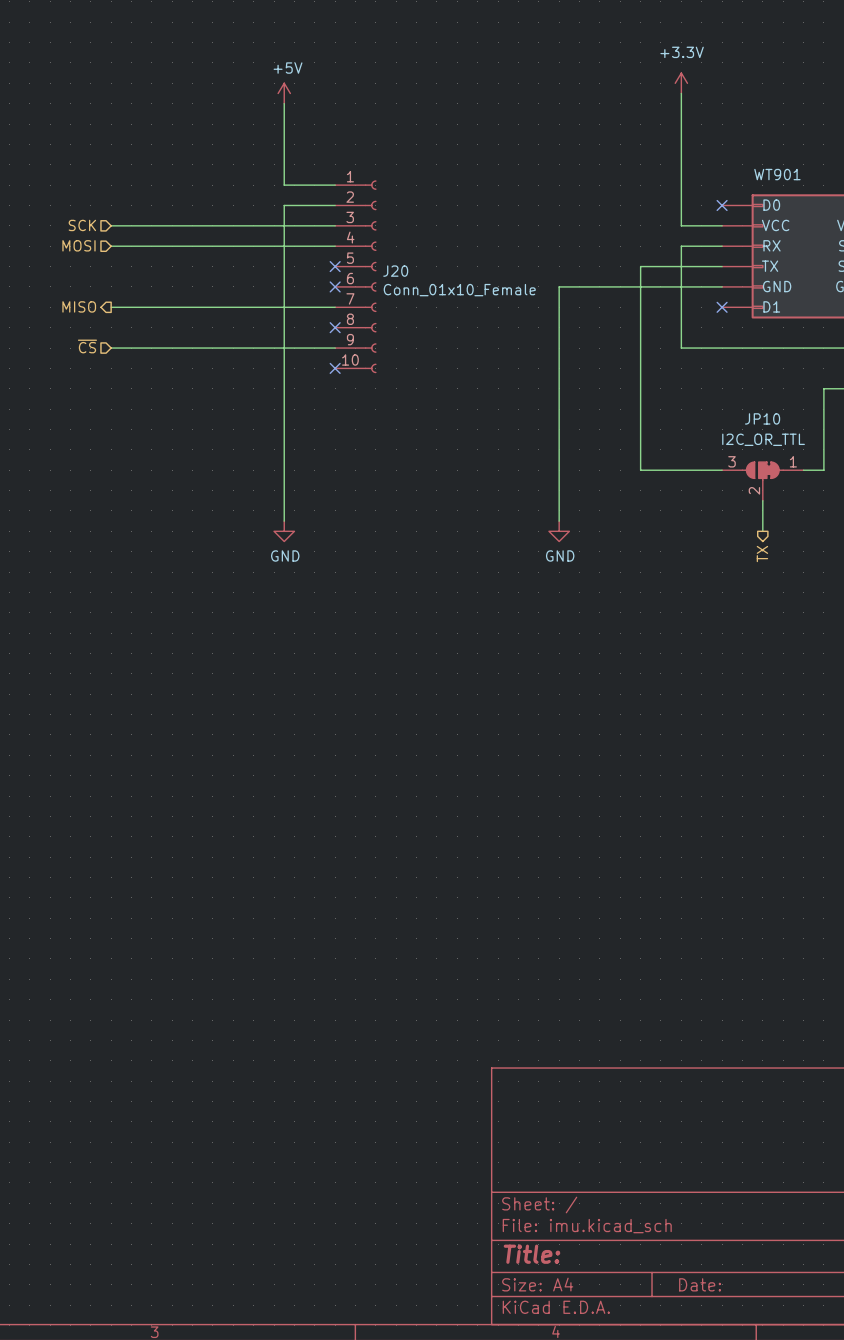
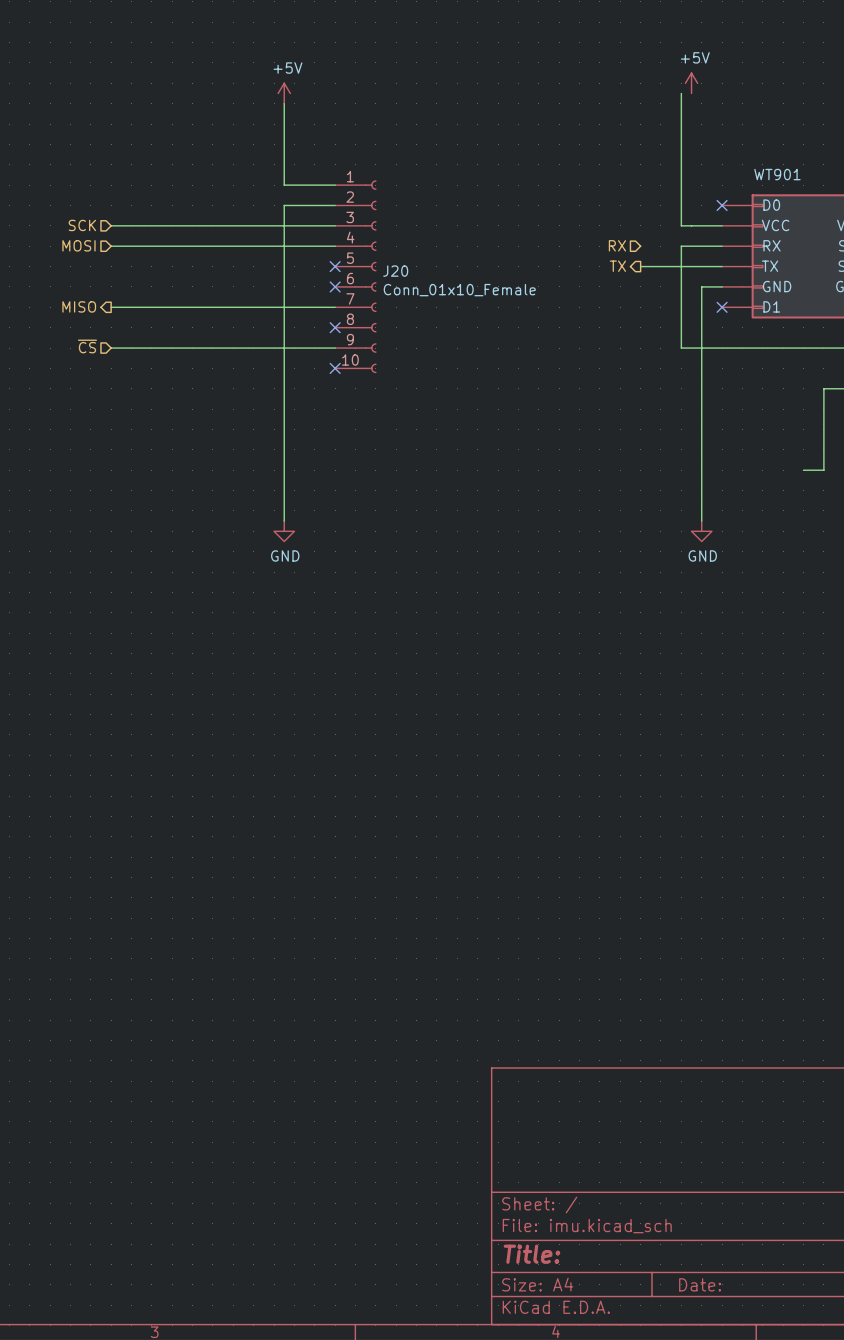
power symbol: +3.3V (681, 83) -> none
power symbol: none -> +5V (691, 83)
hierarchical label: none -> RX (617, 245)
hierarchical label: none -> TX (617, 266)
wire: (640, 266) (640, 470) (722, 470) -> none
wire: (701, 286) (559, 286) (559, 521) -> (701, 286) (701, 521)
JP10: I2C_OR_TTL (762, 481) -> none
wire: (762, 500) (762, 531) -> none
power symbol position: GND (559, 531) -> GND (701, 531)
hierarchical label: TX (762, 554) -> none

